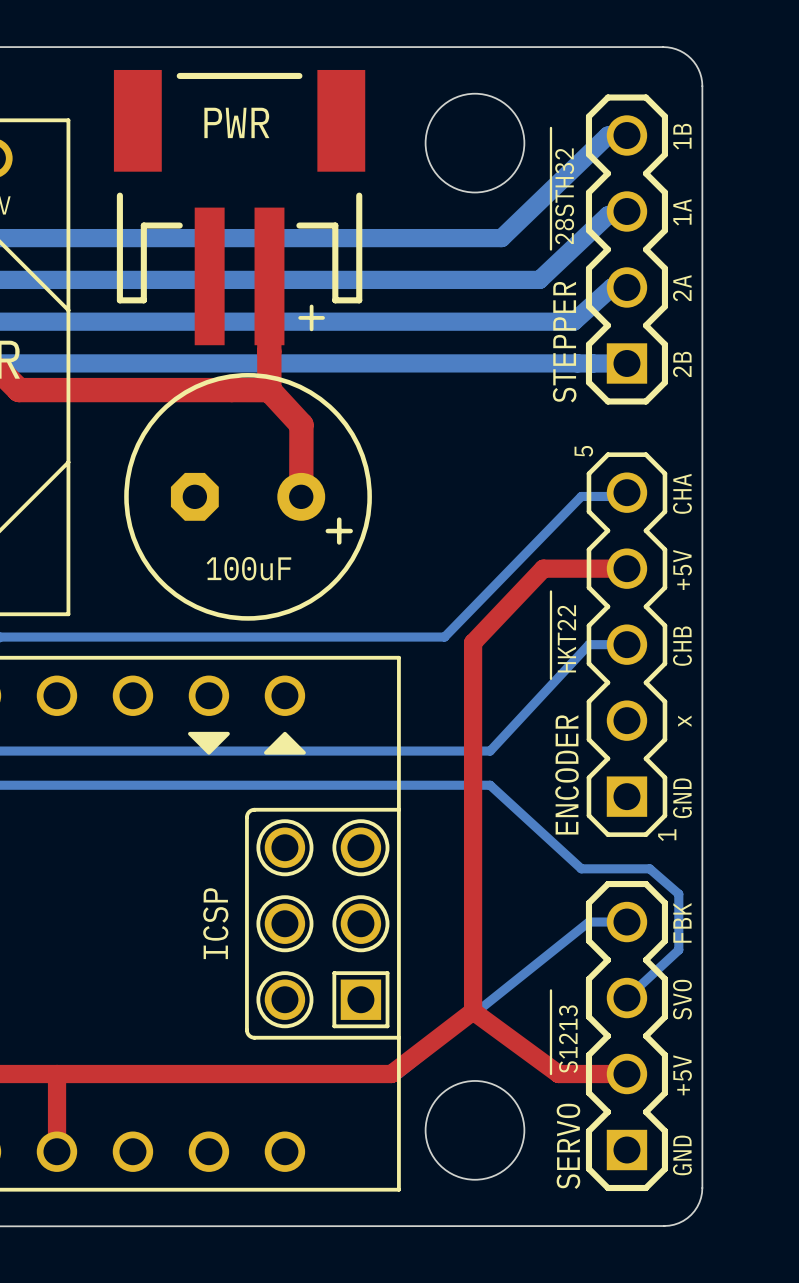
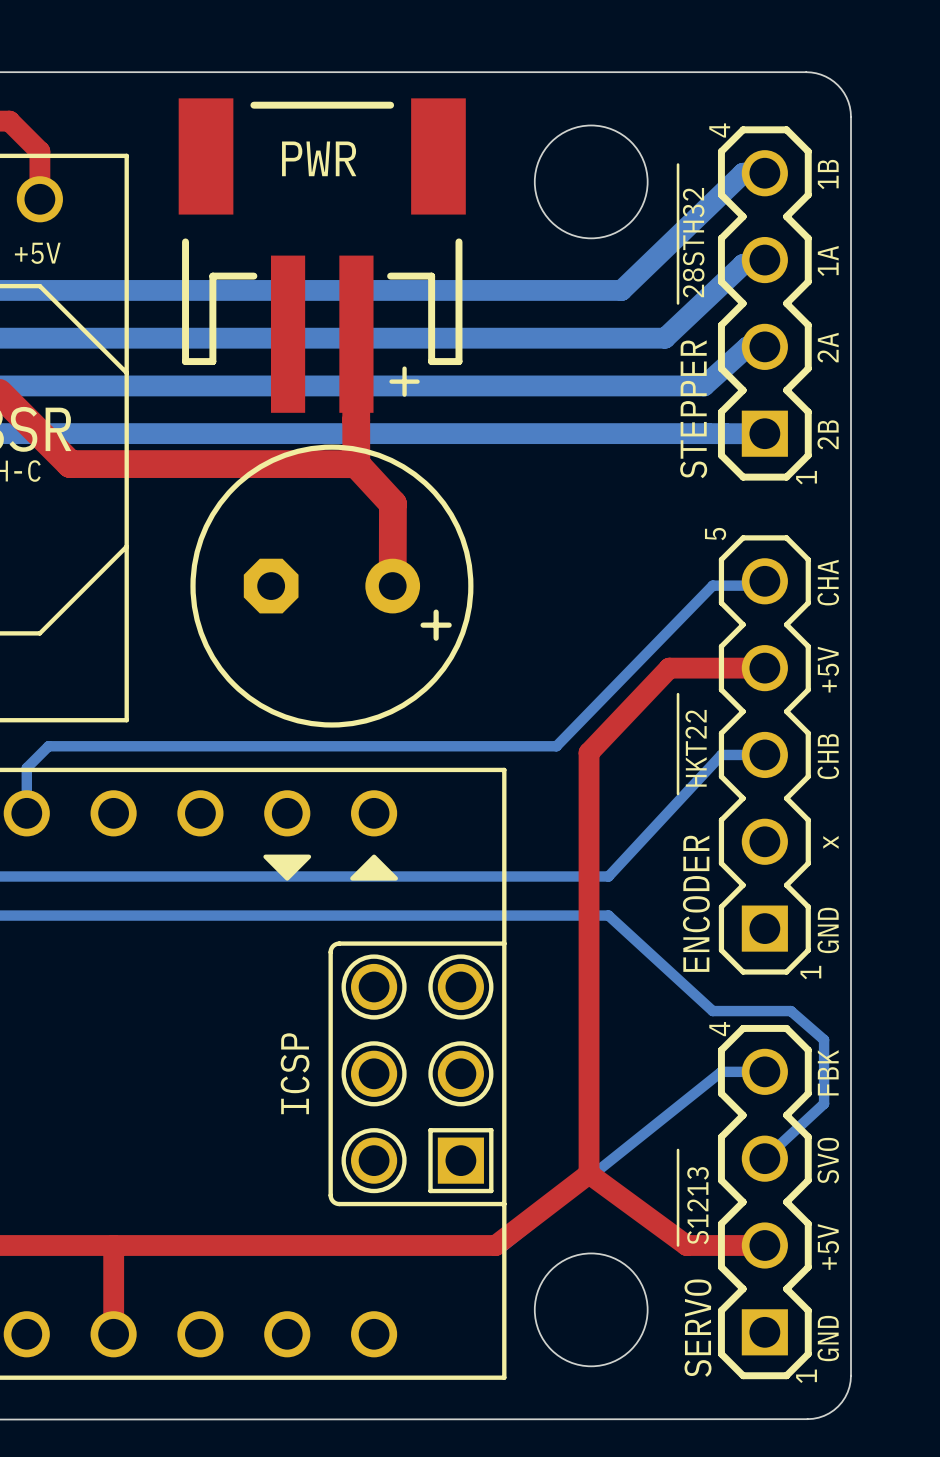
STEPPER text: none -> 4 (719, 130)
STEPPER text: none -> 1 (806, 477)
part value: 100uF (248, 568) -> none
SERVO text: none -> 4 (719, 1029)
SERVO text: none -> 1 (806, 1376)

